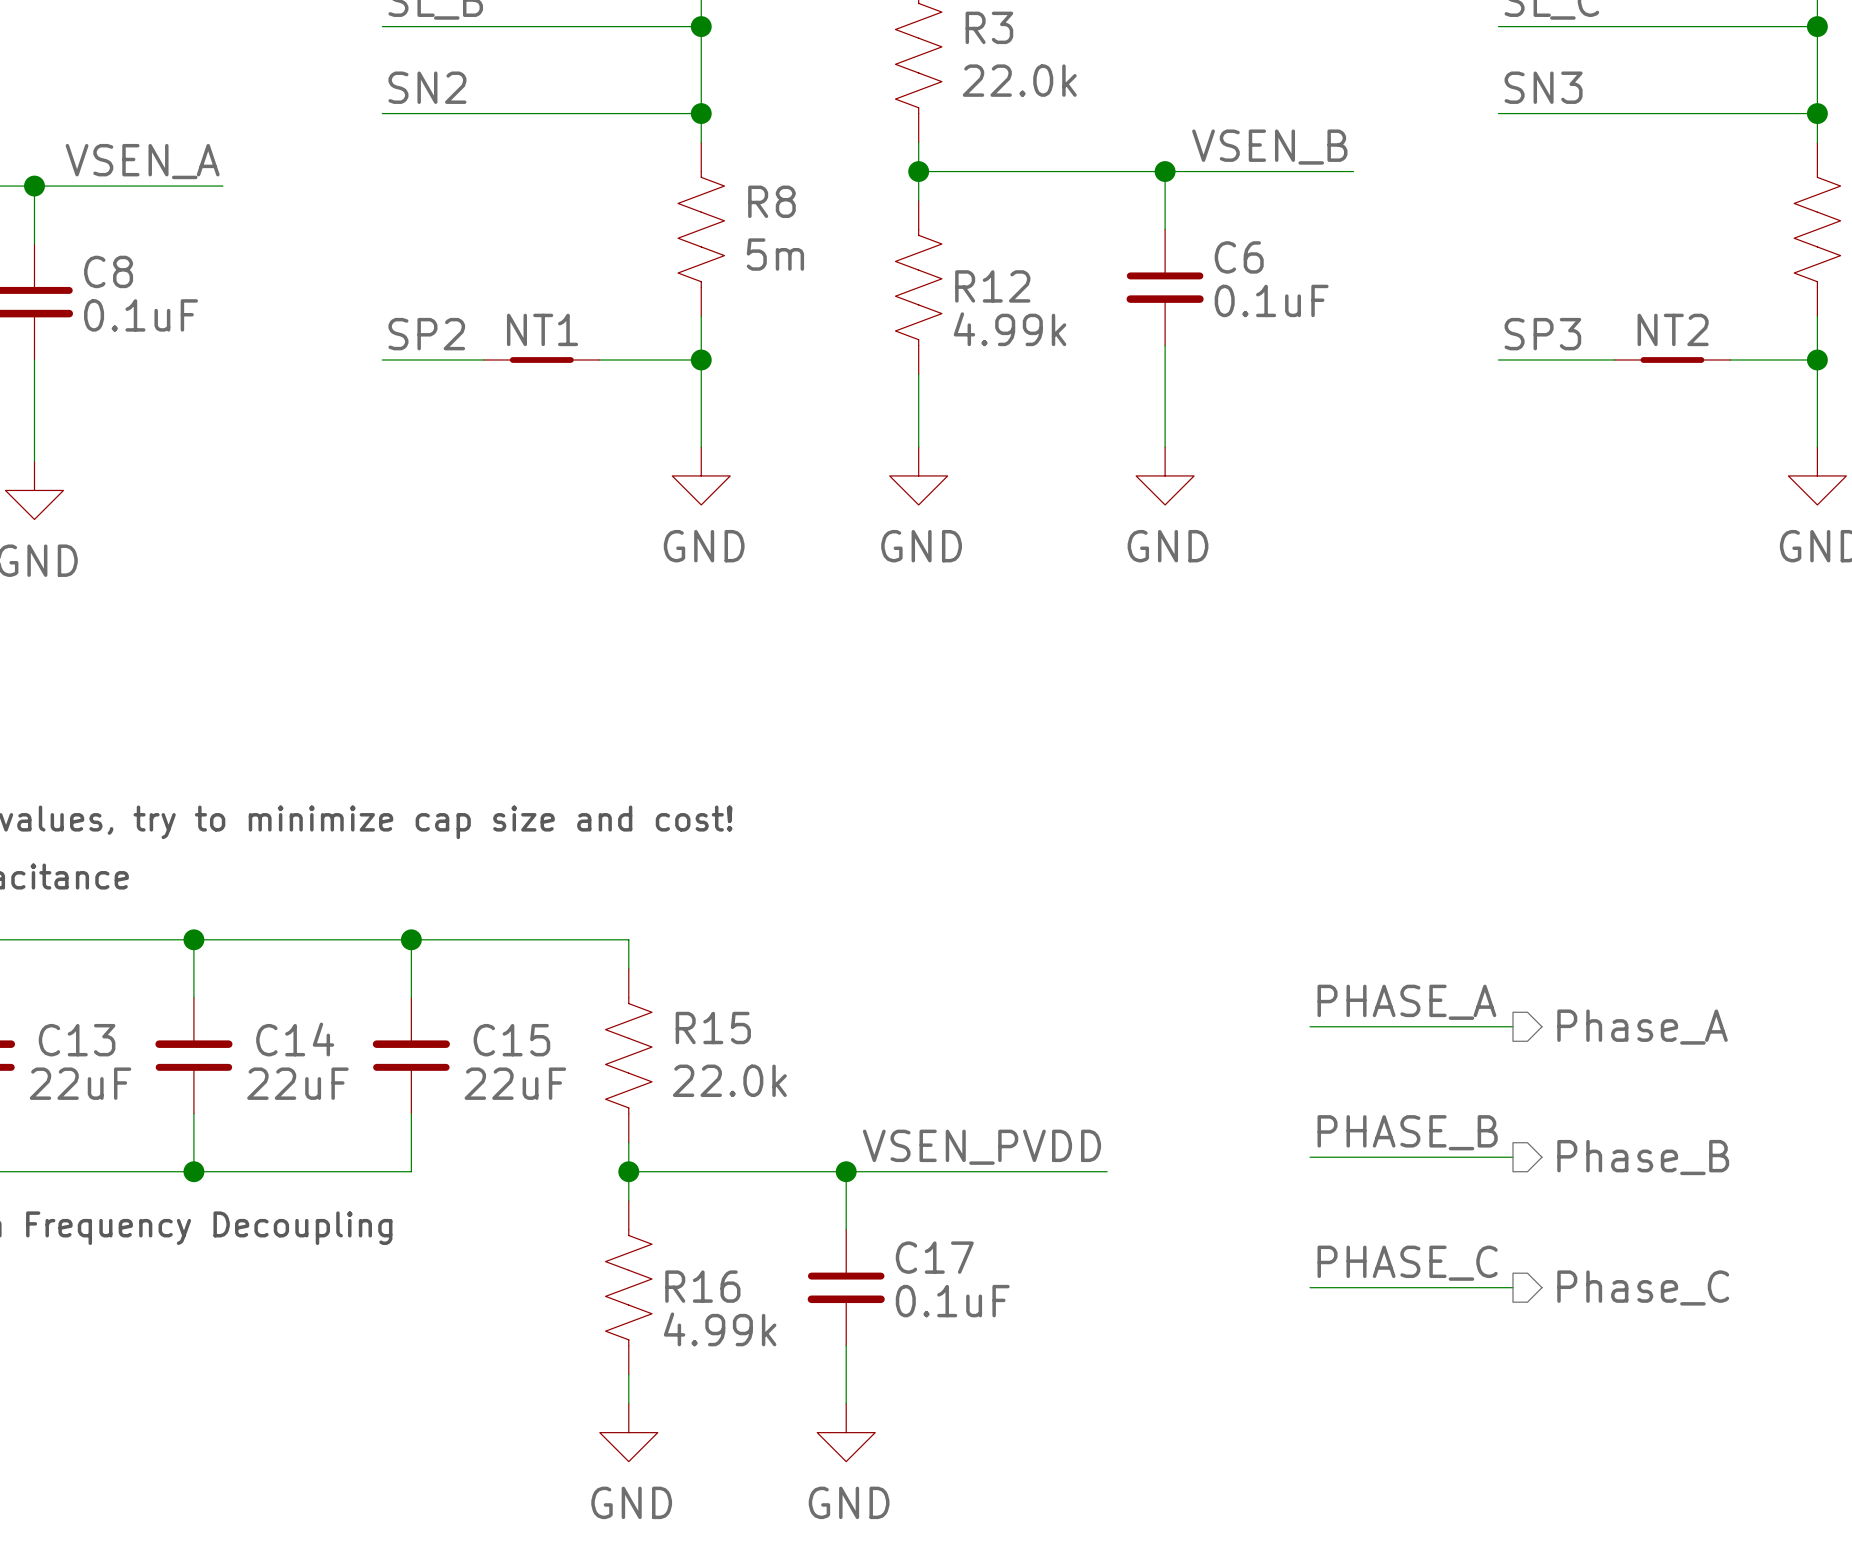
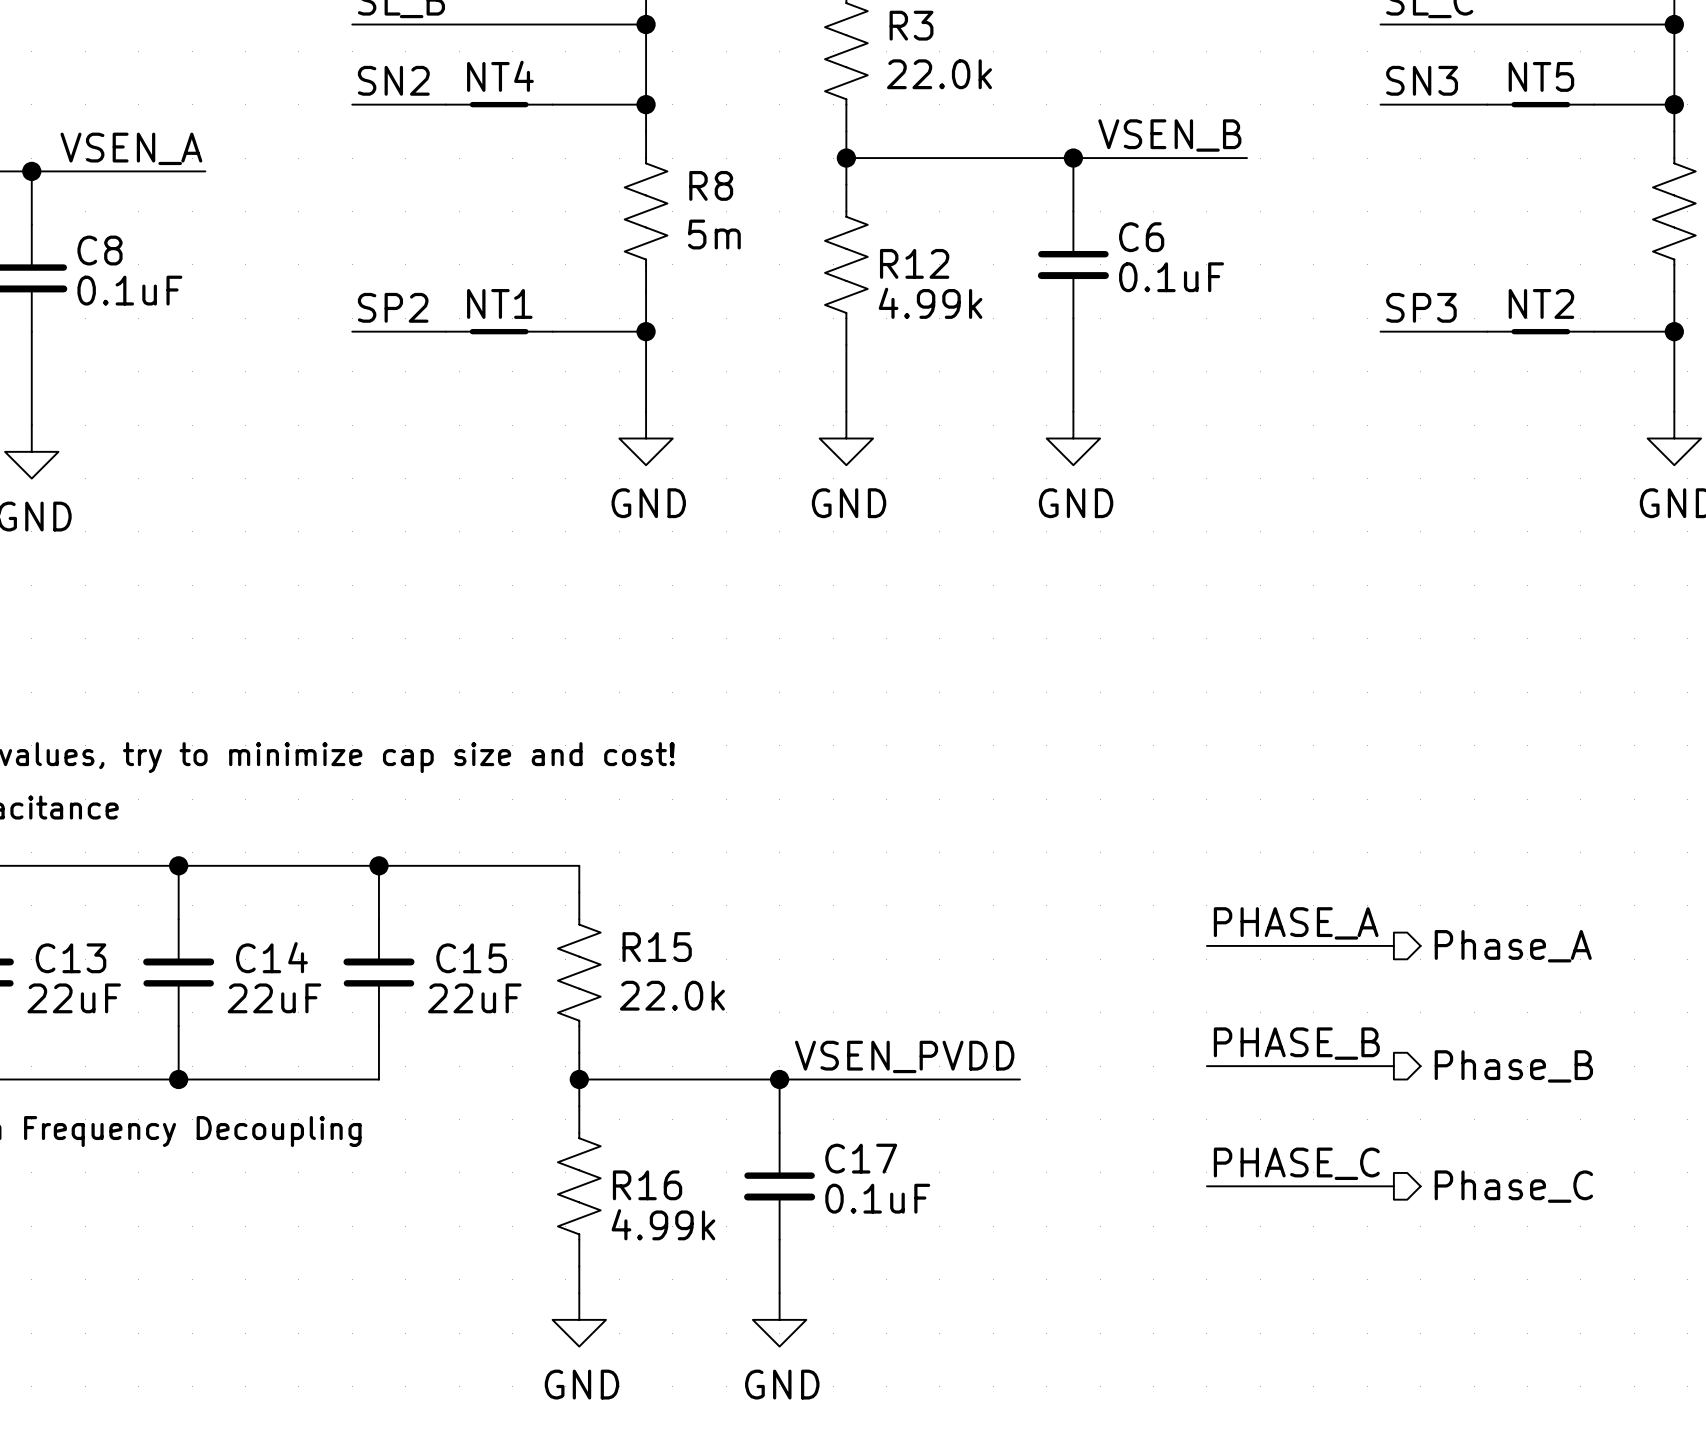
NT4: none -> (499, 104)
NT5: none -> (1540, 104)

